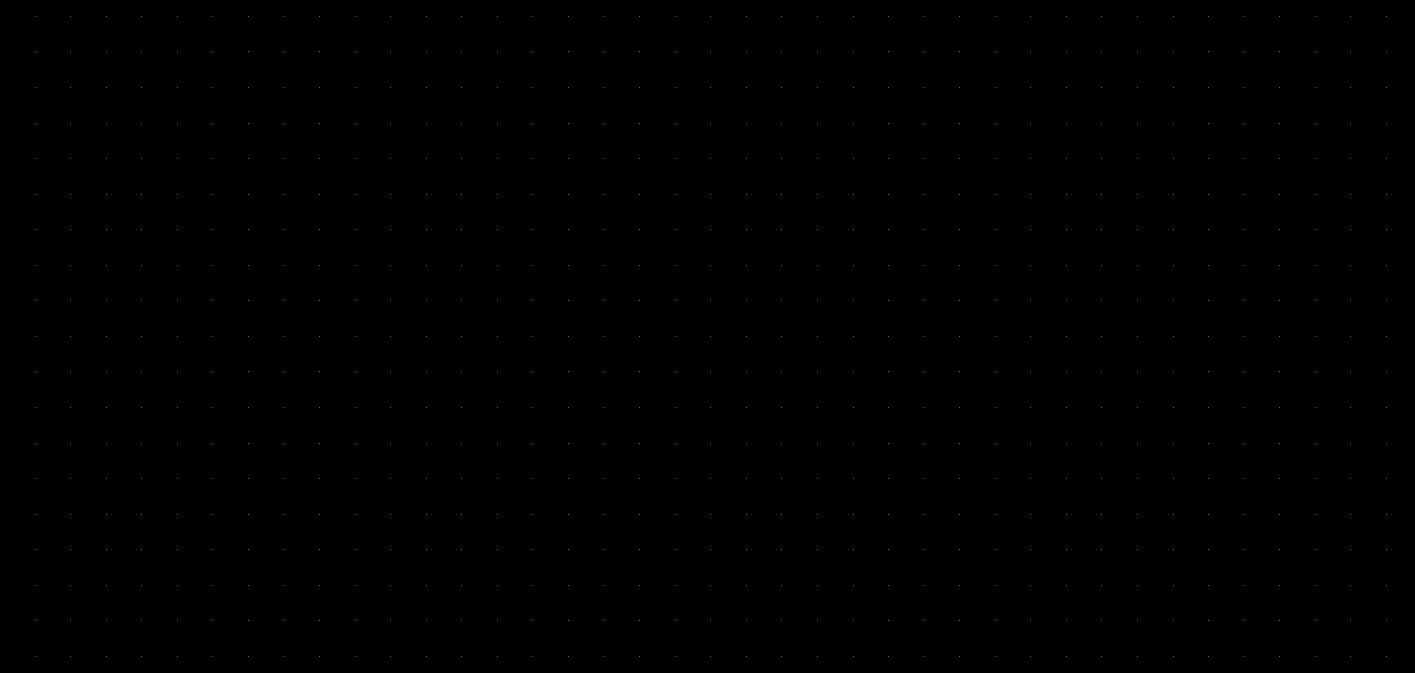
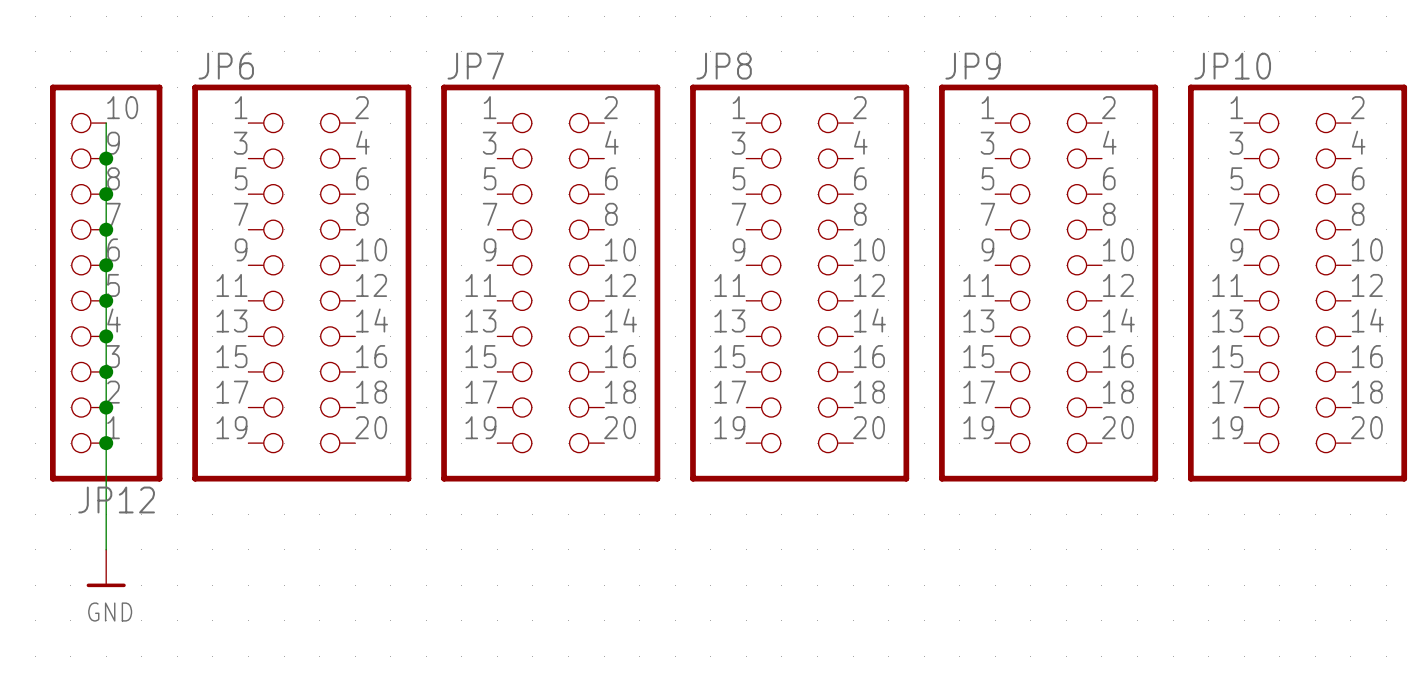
wire: none -> (106, 123) (106, 549)
junction: none -> (106, 158)
junction: none -> (106, 194)
junction: none -> (106, 229)
junction: none -> (106, 265)
JP12: none -> (106, 283)
JP6: none -> (301, 283)
JP7: none -> (550, 283)
JP8: none -> (799, 283)
JP9: none -> (1048, 283)
JP10: none -> (1297, 283)
junction: none -> (106, 300)
junction: none -> (106, 336)
junction: none -> (106, 371)
junction: none -> (106, 407)
junction: none -> (106, 443)
power symbol: none -> GND (106, 568)

